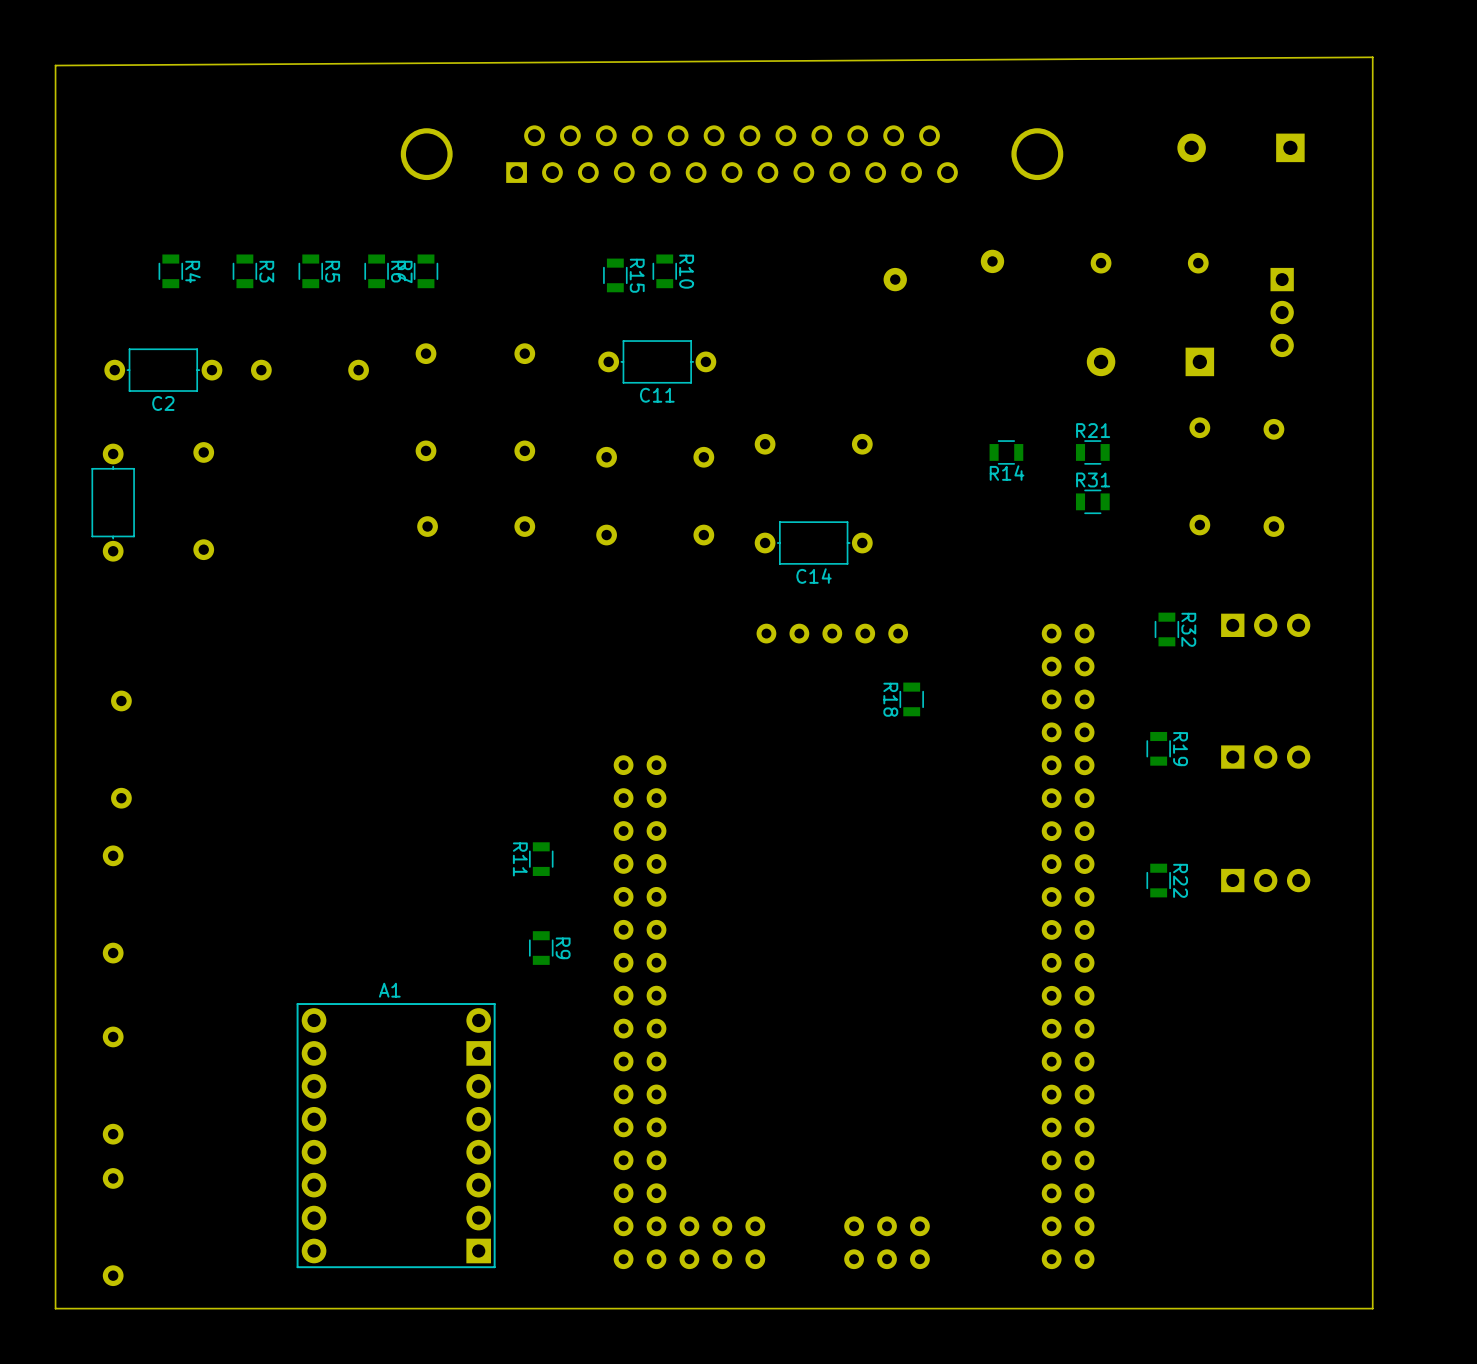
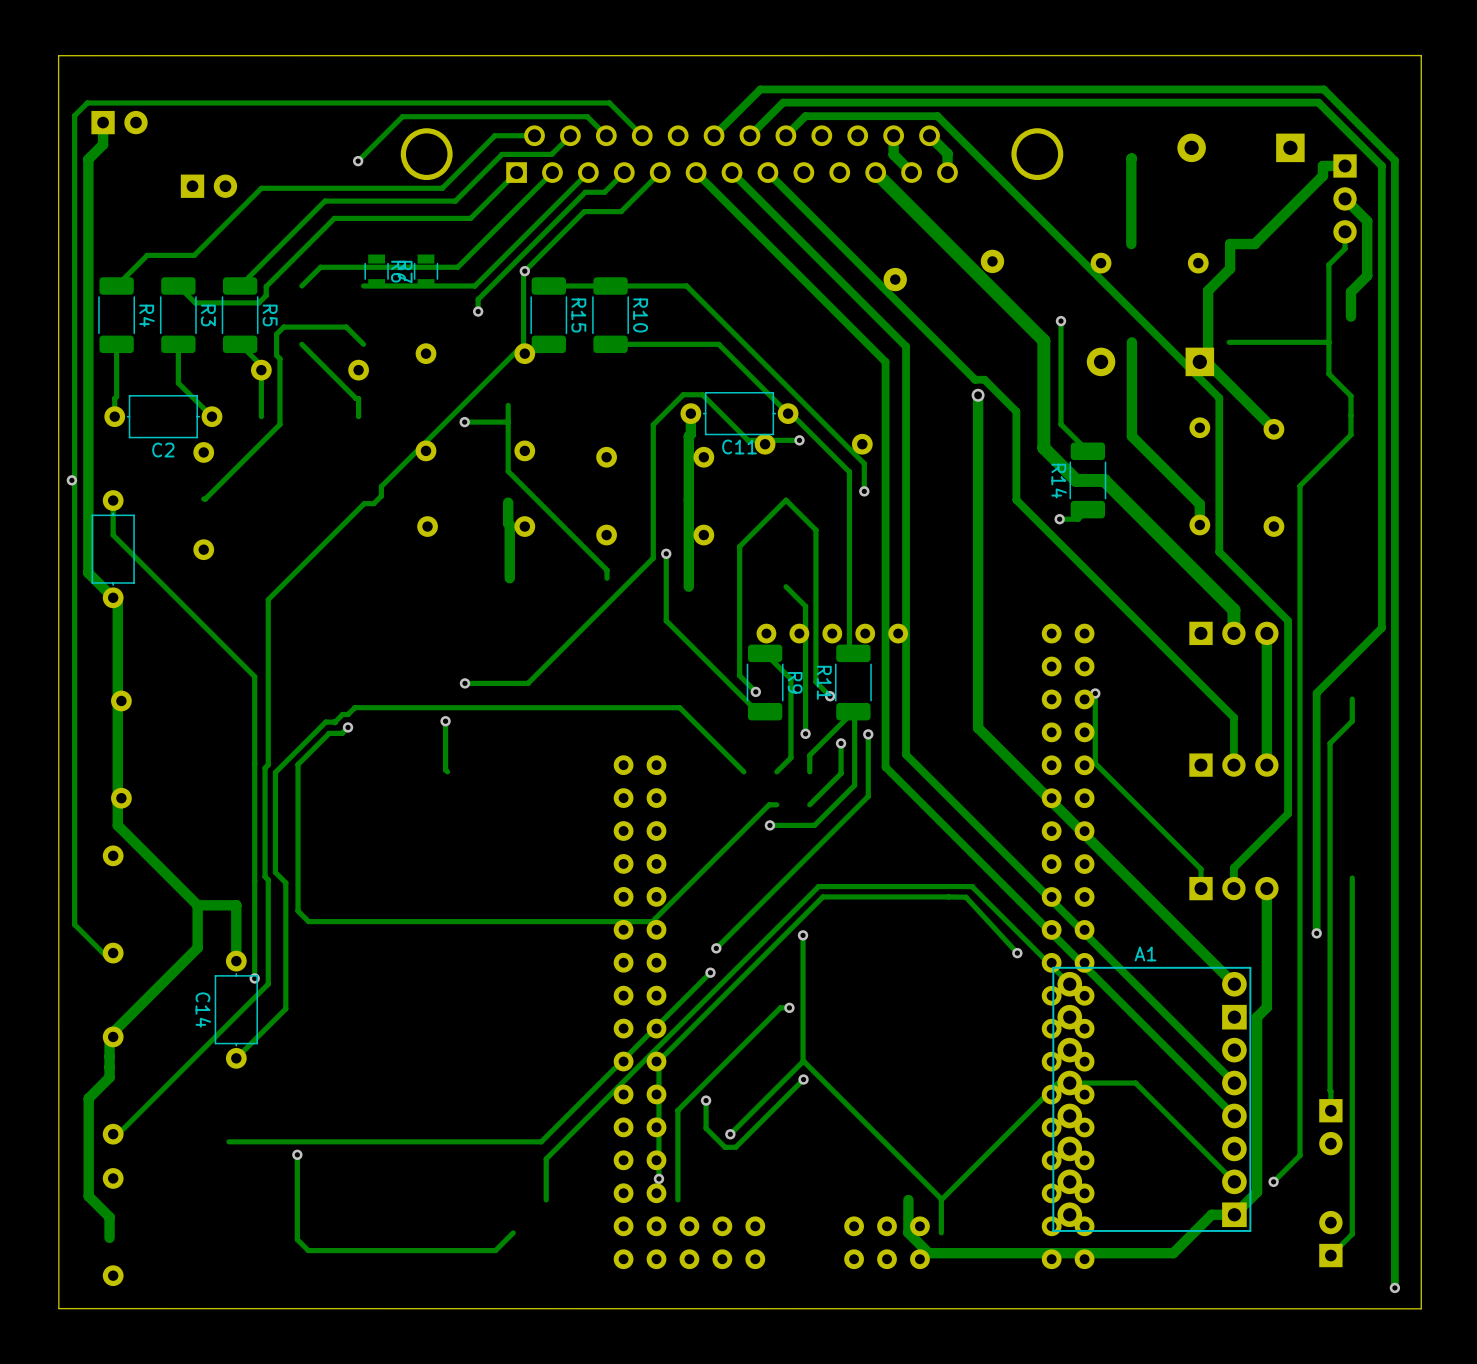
board edge: (1372, 57) (1372, 1308) (55, 1308) (55, 65) (1372, 57) -> (1421, 55) (1421, 1308) (58, 1308) (58, 55) (1421, 55)
track: none -> (103, 122) (103, 144) (88, 159) (88, 572) (117, 602) (117, 825) (197, 905)
part: none -> (119, 122)
track: none -> (534, 135) (494, 135) (442, 188) (261, 188) (194, 255) (147, 255) (116, 285)
track: none -> (570, 135) (551, 154) (502, 154) (455, 201) (325, 201) (240, 285)
track: none -> (606, 135) (587, 116) (402, 116) (358, 161)
track: none -> (642, 135) (609, 103) (87, 103) (74, 115) (74, 924) (109, 959)
track: none -> (714, 135) (760, 89) (1323, 89) (1394, 160) (1394, 1287)
track: none -> (749, 135) (783, 102) (1318, 102) (1381, 165) (1381, 628) (1316, 693) (1316, 933)
track: none -> (785, 135) (805, 116) (937, 116) (1219, 397) (1219, 552) (1288, 620) (1288, 813) (1233, 867) (1233, 888)
track: none -> (893, 135) (893, 154) (911, 172)
track: none -> (929, 135) (947, 153) (947, 172)
track: none -> (1131, 158) (1131, 244)
via: none -> (358, 161)
track: none -> (1345, 165) (1322, 165) (1322, 175) (1254, 244) (1230, 244) (1230, 268) (1208, 290) (1208, 363) (1273, 429)
track: none -> (516, 172) (470, 218) (334, 218) (266, 286) (266, 295) (258, 302) (195, 302) (178, 285)
track: none -> (552, 172) (457, 267) (320, 267) (301, 285)
track: none -> (588, 172) (474, 285) (363, 285)
track: none -> (624, 172) (604, 192) (585, 192) (478, 299) (478, 311)
track: none -> (660, 172) (621, 211) (584, 211) (523, 272) (523, 344) (381, 486) (381, 496) (373, 503) (364, 503) (268, 599) (268, 764) (265, 768) (265, 876) (268, 879) (268, 984) (111, 1140) (109, 1140)
track: none -> (696, 172) (885, 361) (885, 767) (1234, 1115)
track: none -> (732, 172) (906, 346) (906, 754) (1234, 1083)
track: none -> (767, 172) (975, 379) (984, 379) (1016, 411) (1016, 499) (1233, 717) (1233, 765)
track: none -> (875, 172) (1043, 340) (1043, 447) (1076, 480) (1104, 480) (1233, 610) (1233, 633)
part: none -> (208, 186)
track: none -> (1345, 198) (1367, 221) (1367, 275) (1350, 292) (1350, 316)
track: none -> (1345, 231) (1345, 248) (1328, 264) (1328, 373) (1350, 395) (1350, 434) (1300, 485) (1300, 1155) (1273, 1181)
R4 footprint: [158, 254, 183, 289] -> [98, 277, 136, 354]
R3 footprint: [232, 254, 258, 289] -> [159, 277, 197, 354]
R5 footprint: [298, 254, 323, 289] -> [221, 277, 259, 354]
R10 footprint: [652, 254, 677, 289] -> [592, 277, 629, 354]
R15 footprint: [603, 258, 628, 293] -> [530, 277, 568, 354]
via: none -> (524, 271)
track: none -> (548, 285) (686, 285) (864, 463) (864, 491)
via: none -> (478, 311)
part position: (1282, 312) -> (1345, 198)
track: none -> (1060, 321) (1060, 424) (1087, 451)
via: none -> (1060, 321)
track: none -> (1131, 342) (1131, 436) (1199, 504) (1199, 524)
track: none -> (1328, 342) (1229, 342)
track: none -> (116, 344) (114, 416)
track: none -> (178, 344) (178, 383) (211, 416)
track: none -> (240, 344) (261, 365) (261, 416)
track: none -> (301, 344) (356, 398) (358, 398) (358, 416)
track: none -> (363, 344) (346, 327) (283, 327) (276, 334) (276, 355) (279, 358) (279, 424) (203, 498)
track: none -> (610, 344) (718, 344) (849, 472) (849, 649) (853, 653)
C11 position: (657, 361) -> (739, 413)
C2 position: (163, 370) -> (163, 416)
track: none -> (978, 395) (978, 727) (1234, 984)
via: none -> (978, 395)
track: none -> (508, 405) (508, 471) (606, 570) (606, 578)
track: none -> (690, 413) (690, 434) (688, 436) (688, 586)
via: none -> (464, 422)
track: none -> (508, 422) (464, 422)
track: none -> (799, 440) (748, 440) (702, 394) (683, 394) (653, 424) (653, 558) (528, 683) (464, 683)
via: none -> (799, 440)
R14 footprint: [989, 440, 1024, 465] -> [1069, 442, 1107, 519]
R21: (1092, 452) -> none
R14 name position: R14 (1007, 473) -> R14 (1059, 481)
via: none -> (71, 480)
via: none -> (864, 491)
track: none -> (113, 500) (113, 535) (254, 676) (254, 978)
R31: (1092, 501) -> none
part position: (113, 502) -> (113, 549)
track: none -> (508, 502) (509, 578)
track: none -> (1087, 509) (1078, 519) (1059, 519)
via: none -> (1059, 519)
C14 rotation: 0° (813, 543) -> 90° clockwise (236, 1009)
C14 position: (813, 543) -> (236, 1009)
track: none -> (666, 553) (666, 620) (757, 711) (765, 711)
via: none -> (666, 553)
track: none -> (786, 586) (805, 606) (805, 733)
part position: (1265, 625) -> (1233, 633)
R32: (1166, 629) -> none
track: none -> (1266, 633) (1266, 765)
track: none -> (765, 653) (790, 679) (790, 757) (776, 771)
via: none -> (464, 683)
track: none -> (755, 691) (739, 675) (739, 546) (786, 500) (815, 530) (815, 682) (830, 696)
via: none -> (755, 691)
track: none -> (1095, 693) (1095, 763) (1201, 869) (1201, 888)
via: none -> (1095, 693)
via: none -> (830, 696)
R18: (911, 699) -> none
track: none -> (1352, 699) (1352, 721) (1330, 743) (1330, 1110)
track: none -> (445, 721) (445, 769) (447, 771)
via: none -> (445, 721)
track: none -> (348, 727) (342, 733) (329, 733) (298, 764) (298, 911) (308, 921) (652, 921) (769, 804) (776, 804)
via: none -> (348, 727)
via: none -> (805, 733)
track: none -> (868, 734) (868, 796) (716, 948)
via: none -> (868, 734)
track: none -> (841, 743) (841, 773) (809, 804)
via: none -> (841, 743)
R19: (1158, 748) -> none
part position: (1265, 757) -> (1233, 765)
track: none -> (743, 771) (679, 707) (354, 707) (348, 714) (342, 714) (335, 722) (325, 722) (275, 772) (275, 872) (285, 882) (285, 1008) (236, 1058)
track: none -> (809, 771) (809, 755) (853, 711) (854, 785) (814, 825) (769, 825)
via: none -> (769, 825)
R11 footprint: [529, 842, 554, 876] -> [834, 644, 872, 721]
track: none -> (1352, 878) (1352, 1234) (1330, 1255)
R22: (1158, 880) -> none
part position: (1265, 880) -> (1233, 888)
track: none -> (1266, 888) (1266, 1007) (1257, 1017) (1257, 1192) (1234, 1214) (1211, 1214) (1173, 1253) (928, 1253) (908, 1232) (908, 1199)
track: none -> (197, 905) (236, 905) (236, 961)
track: none -> (197, 905) (197, 947) (109, 1036) (109, 1077) (88, 1098) (88, 1196) (109, 1217) (109, 1237)
R9 footprint: [529, 931, 554, 965] -> [746, 644, 784, 721]
via: none -> (1316, 933)
track: none -> (803, 935) (803, 1061)
via: none -> (803, 935)
via: none -> (716, 948)
track: none -> (1017, 953) (965, 897) (822, 896) (658, 1060) (658, 1178)
via: none -> (1017, 953)
track: none -> (710, 972) (541, 1141) (228, 1141)
via: none -> (710, 972)
via: none -> (254, 978)
track: none -> (1069, 984) (972, 886) (818, 886) (546, 1158) (546, 1199)
track: none -> (789, 1007) (780, 1007) (677, 1110) (677, 1199)
via: none -> (789, 1007)
track: none -> (803, 1061) (941, 1198) (941, 1232)
track: none -> (803, 1061) (730, 1134)
track: none -> (803, 1079) (735, 1147) (725, 1147) (706, 1128) (706, 1100)
via: none -> (803, 1079)
via: none -> (706, 1100)
part: none -> (1330, 1127)
via: none -> (730, 1134)
A1 position: (396, 1135) -> (1151, 1099)
track: none -> (297, 1154) (297, 1239) (308, 1250) (495, 1250) (513, 1232)
via: none -> (297, 1154)
via: none -> (658, 1178)
track: none -> (1234, 1181) (1135, 1083) (1058, 1083) (941, 1199)
via: none -> (1273, 1181)
part: none -> (1330, 1239)
via: none -> (1394, 1287)

